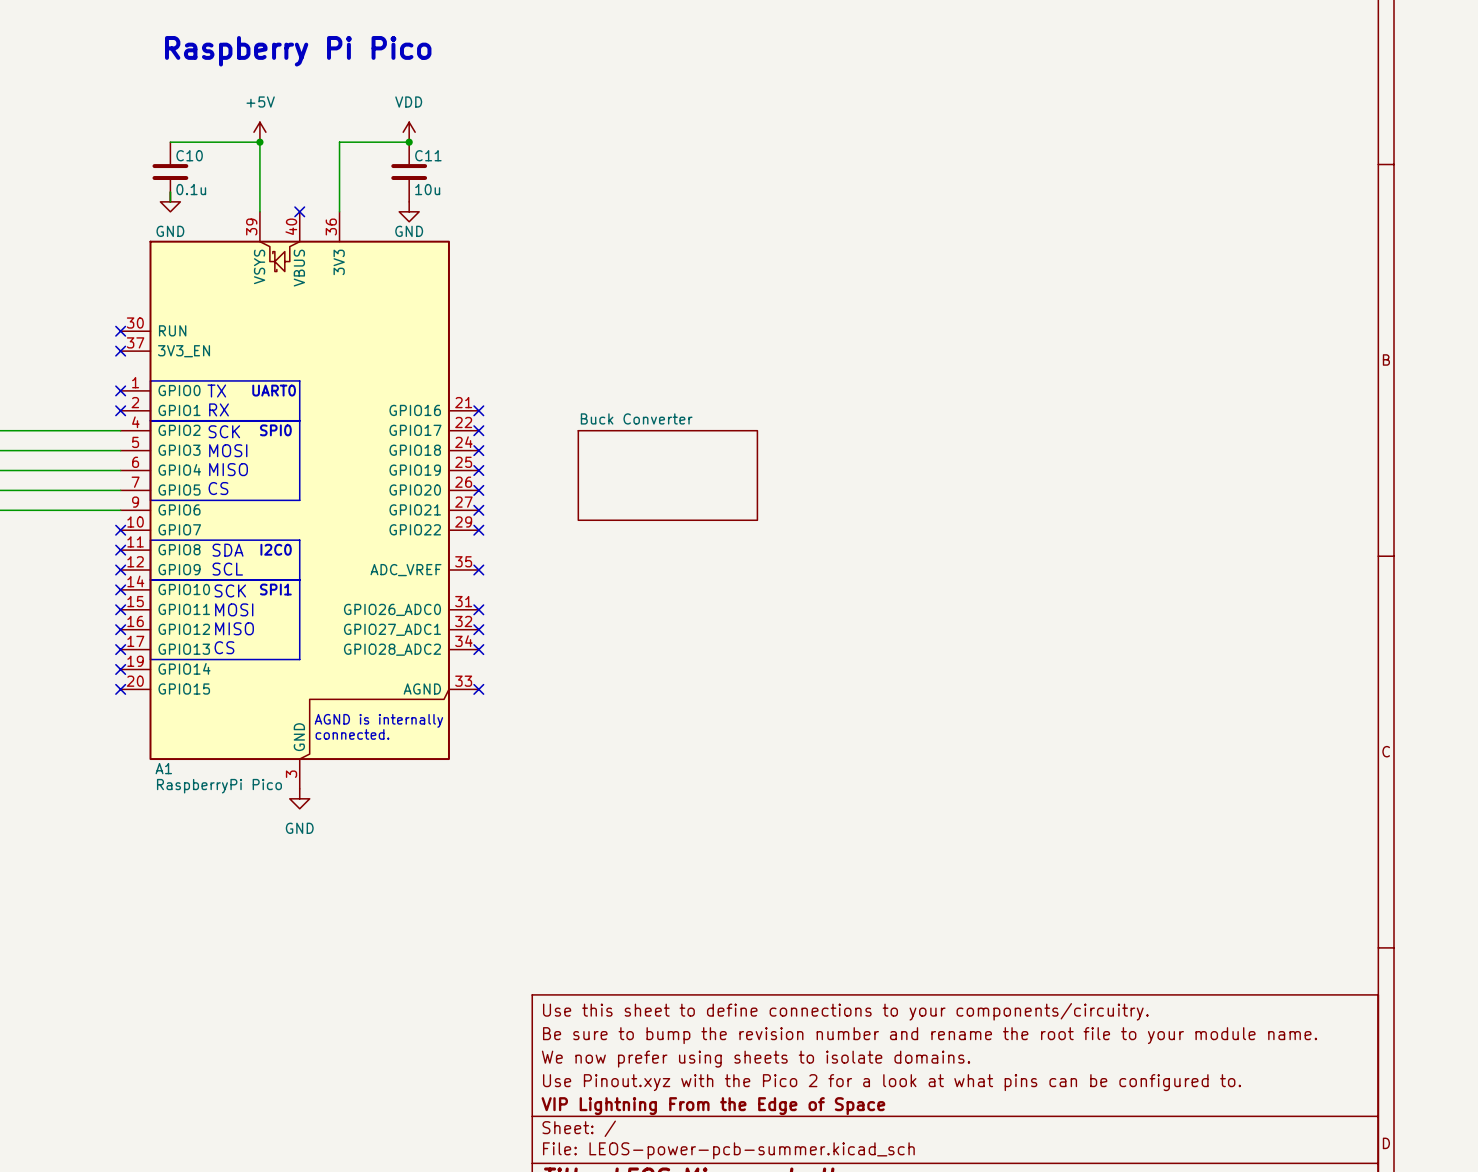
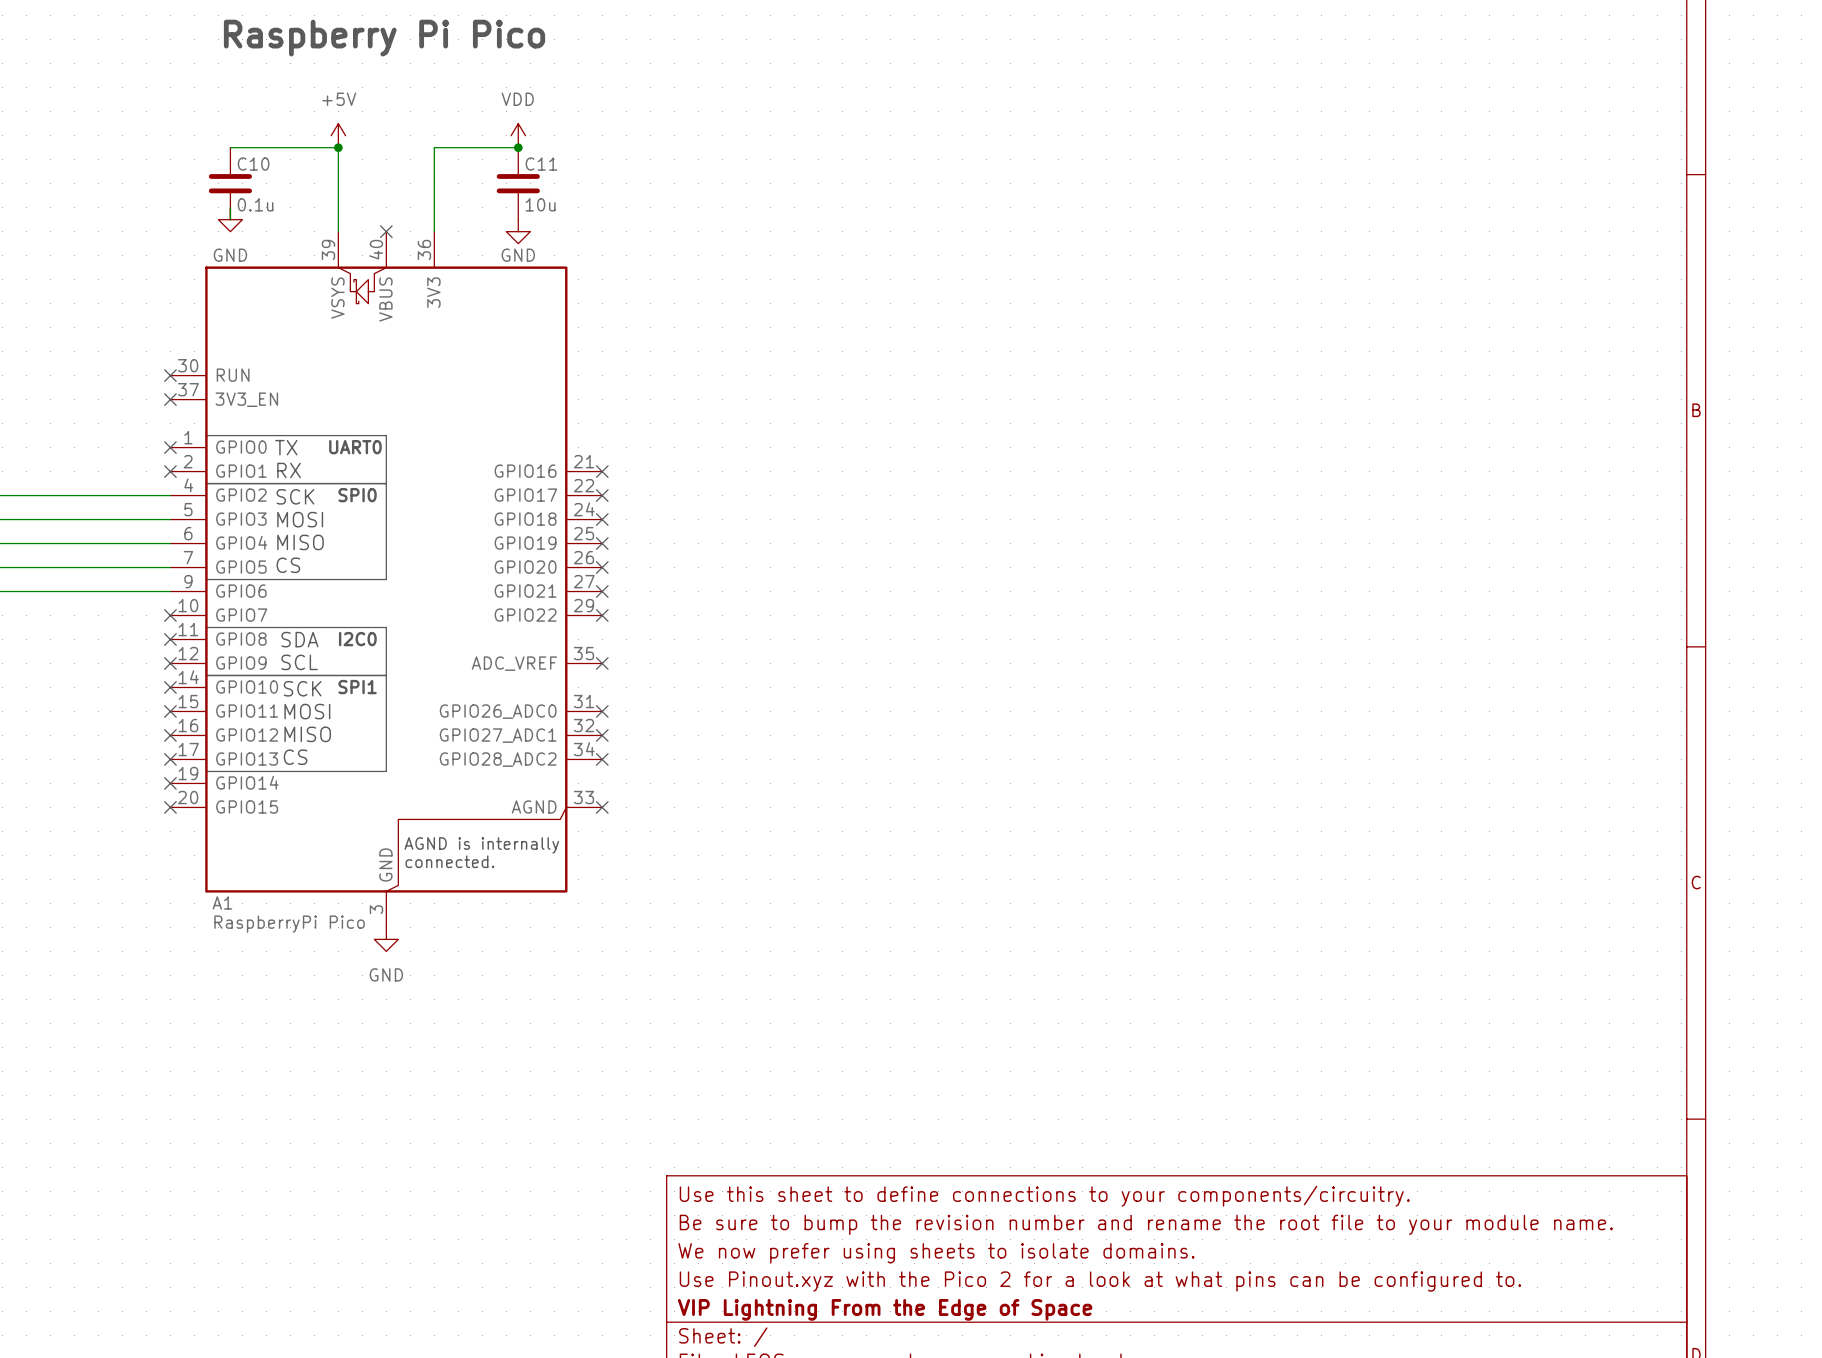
sheet Buck Converter: (667, 475) -> none

